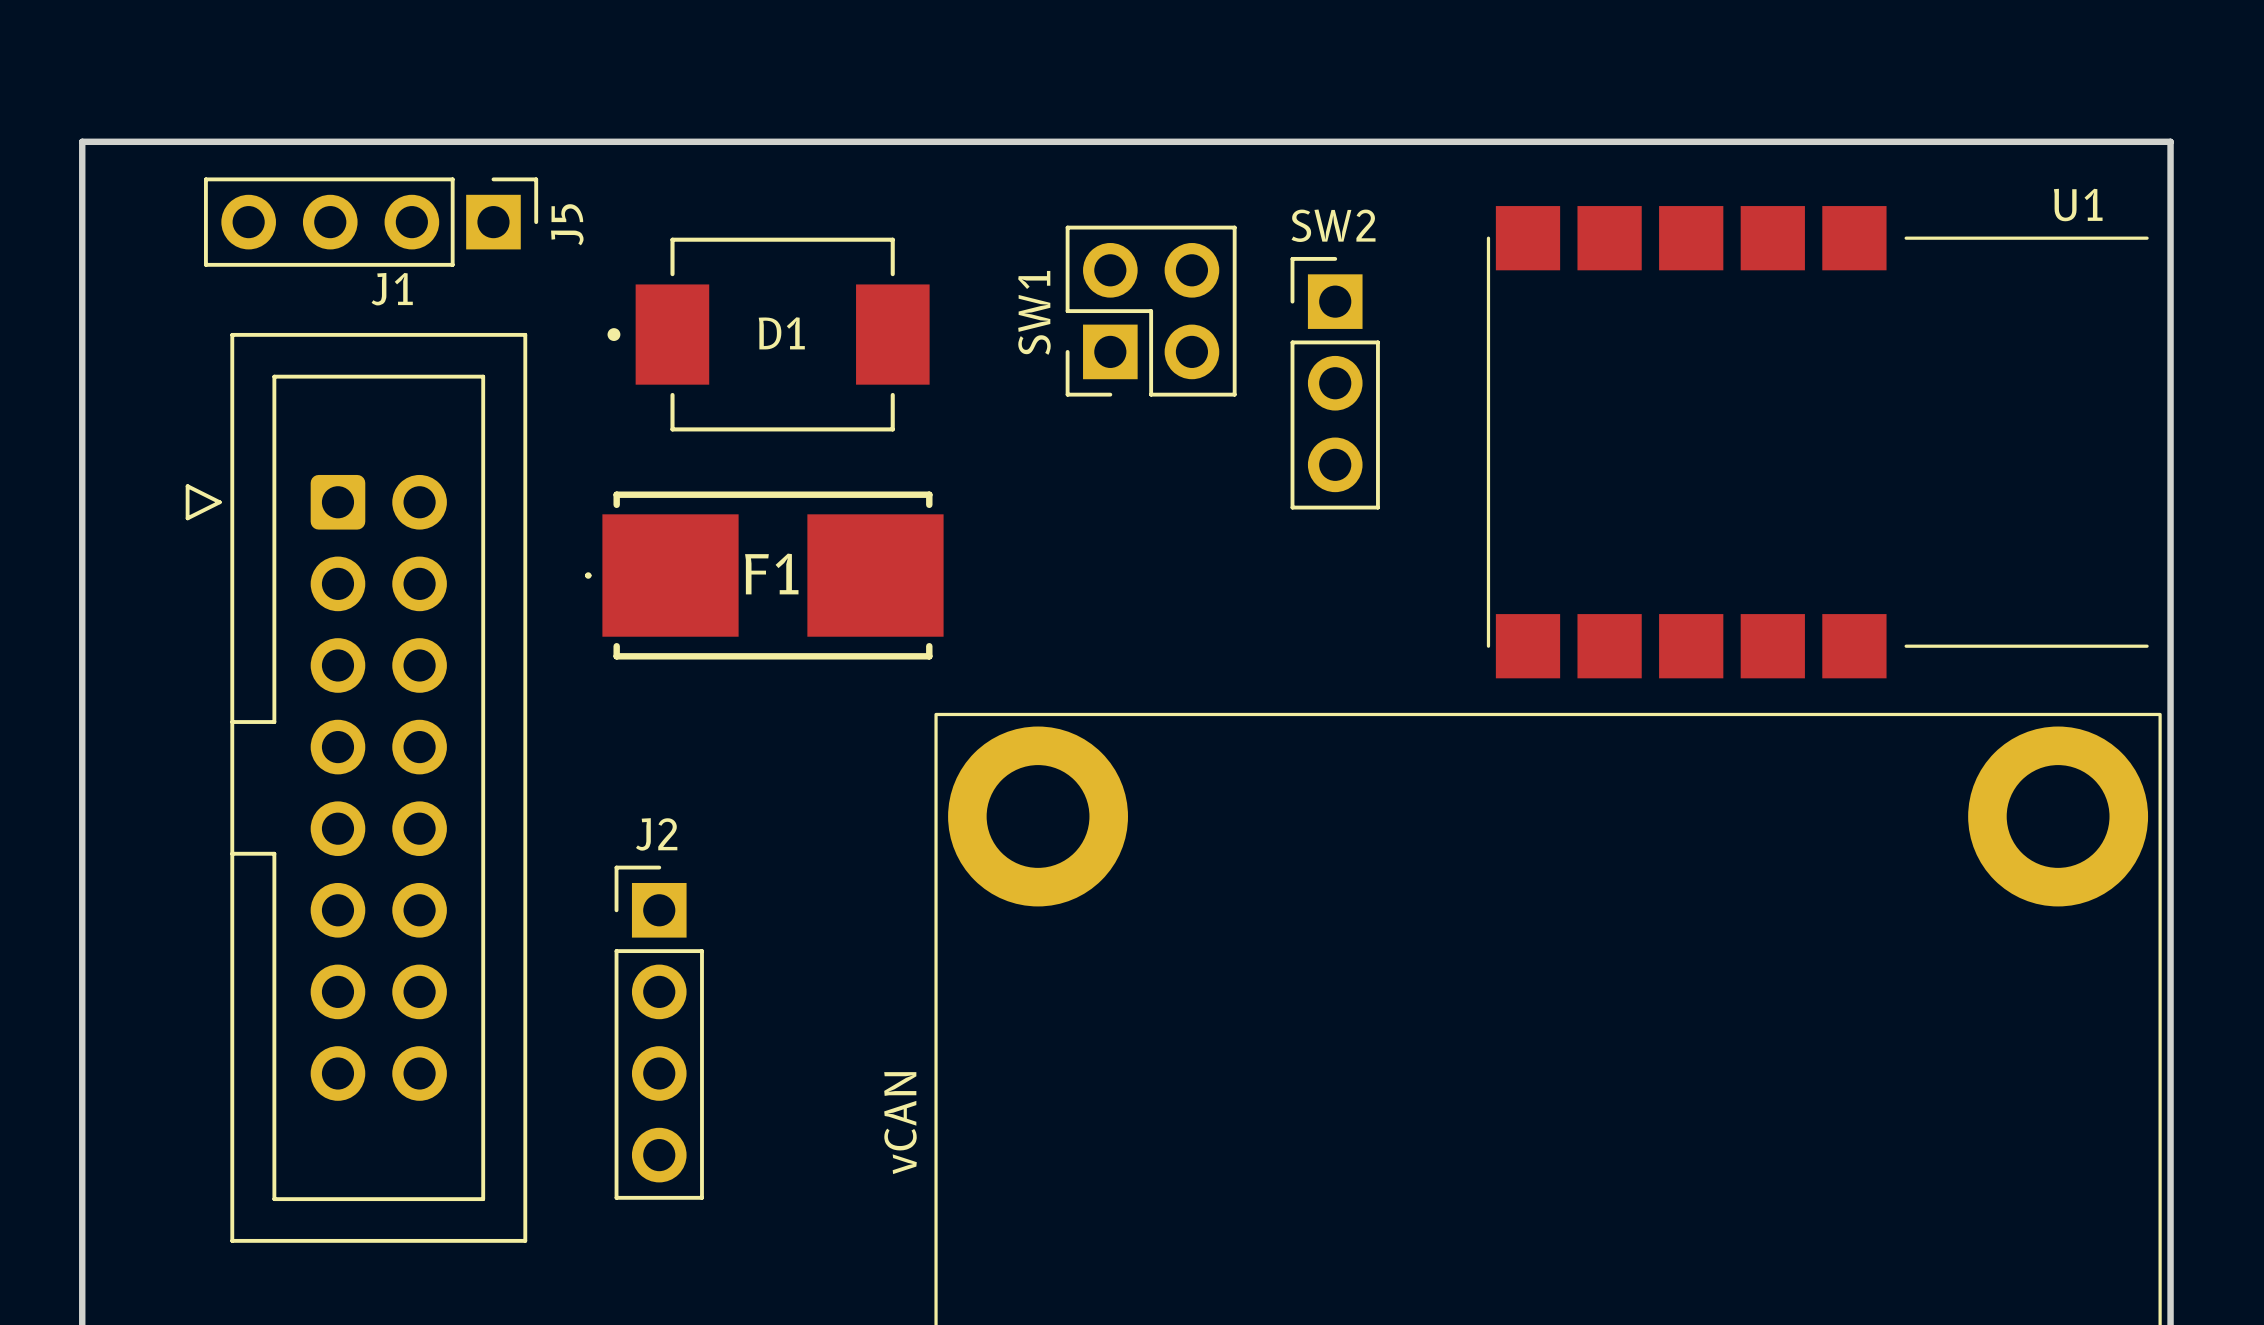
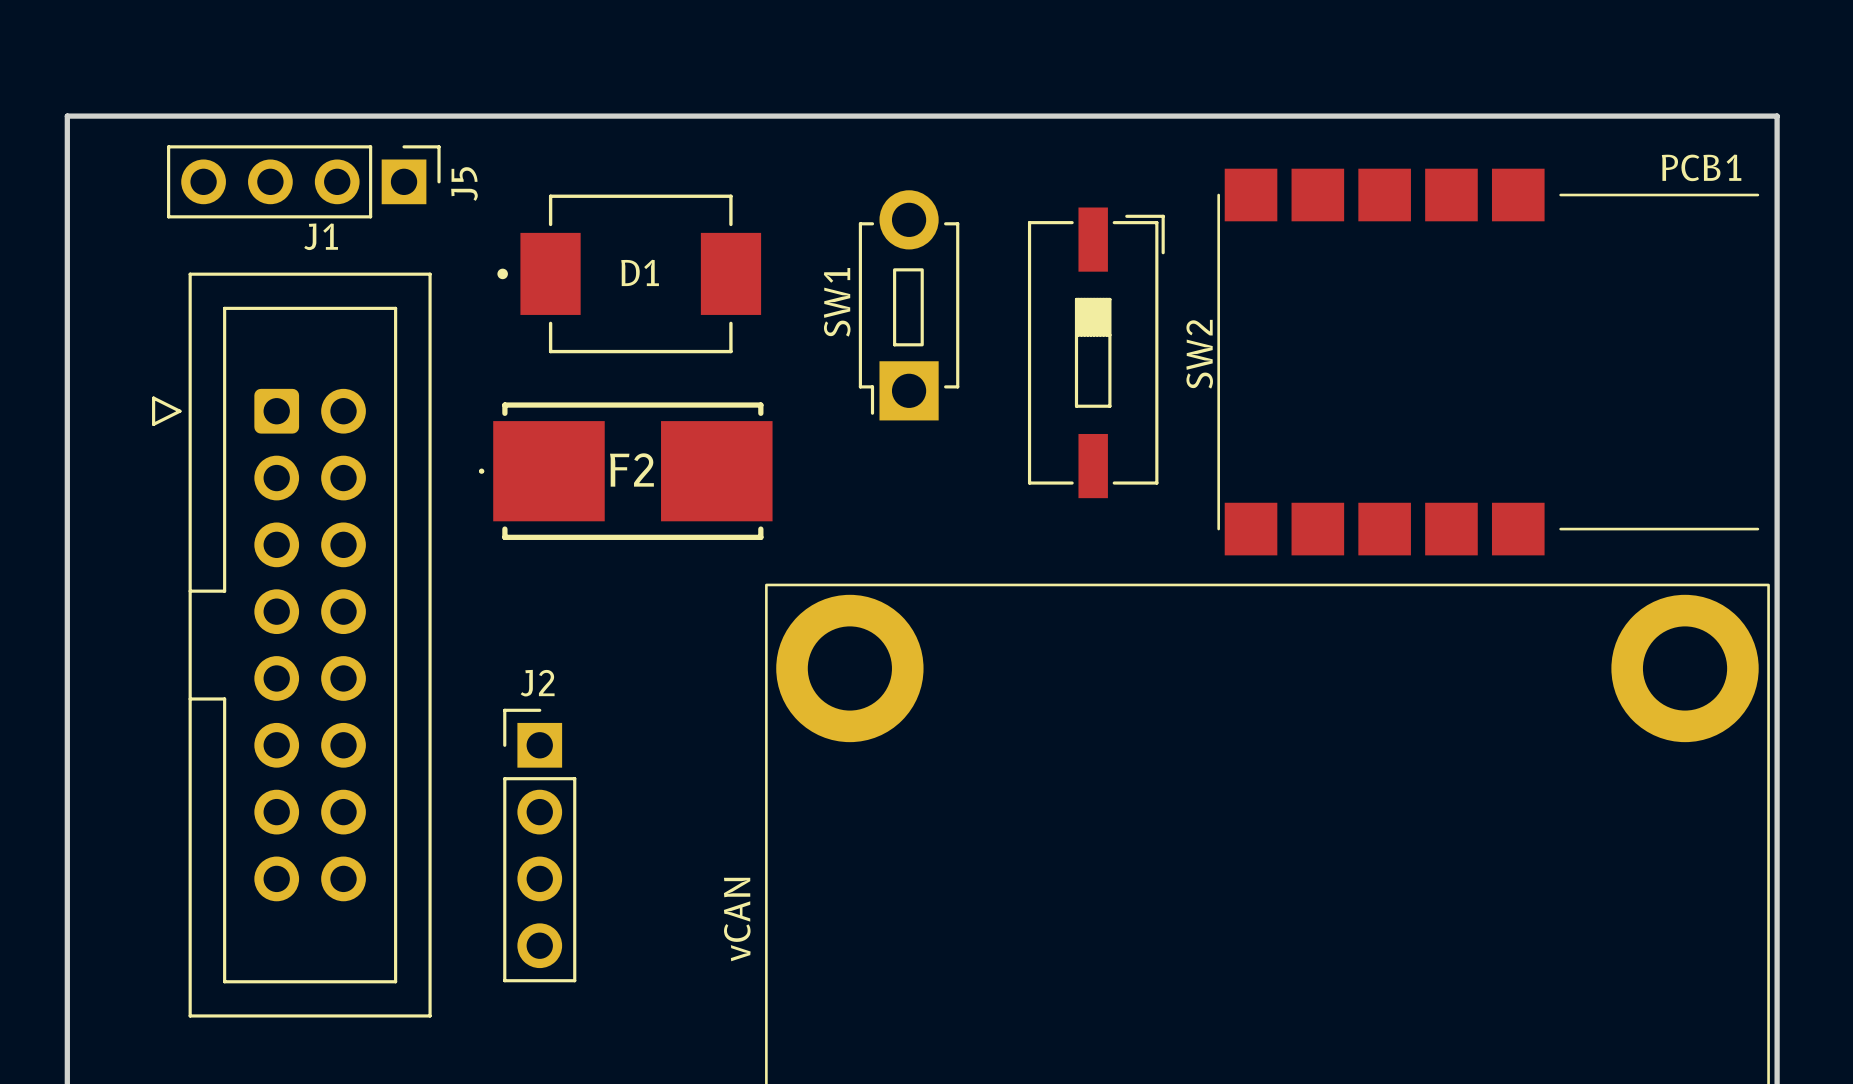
U1 name: U1 (2078, 205) -> PCB1 (1701, 167)
SW1 footprint: [1065, 225, 1237, 397] -> [858, 190, 960, 421]
SW2 name position: SW2 (1333, 225) -> SW2 (1199, 354)
SW2 footprint: [1290, 256, 1380, 510] -> [1027, 207, 1165, 499]
F1 name: F1 (771, 573) -> F2 (631, 469)

